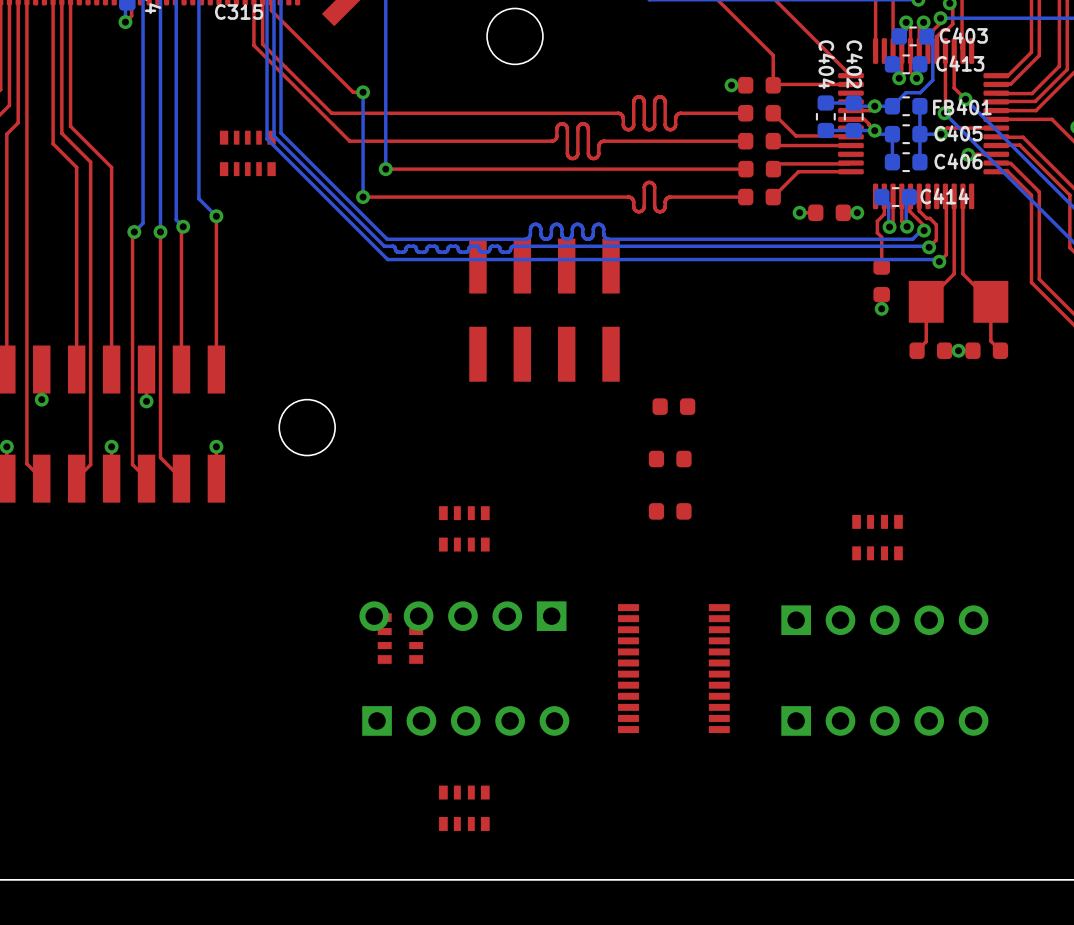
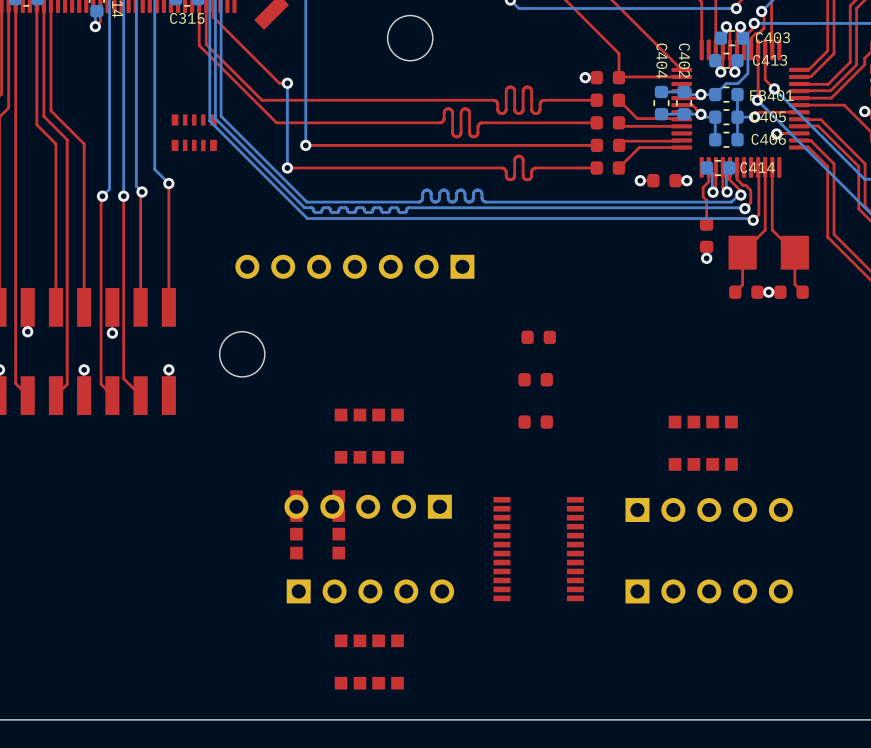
part: (544, 310) -> none
part: none -> (354, 266)
part footprint: [439, 506, 490, 552] -> [334, 408, 404, 464]
part footprint: [852, 514, 903, 561] -> [668, 415, 738, 471]
part footprint: [377, 613, 424, 664] -> [290, 490, 346, 560]
part footprint: [439, 785, 490, 831] -> [334, 634, 404, 690]

